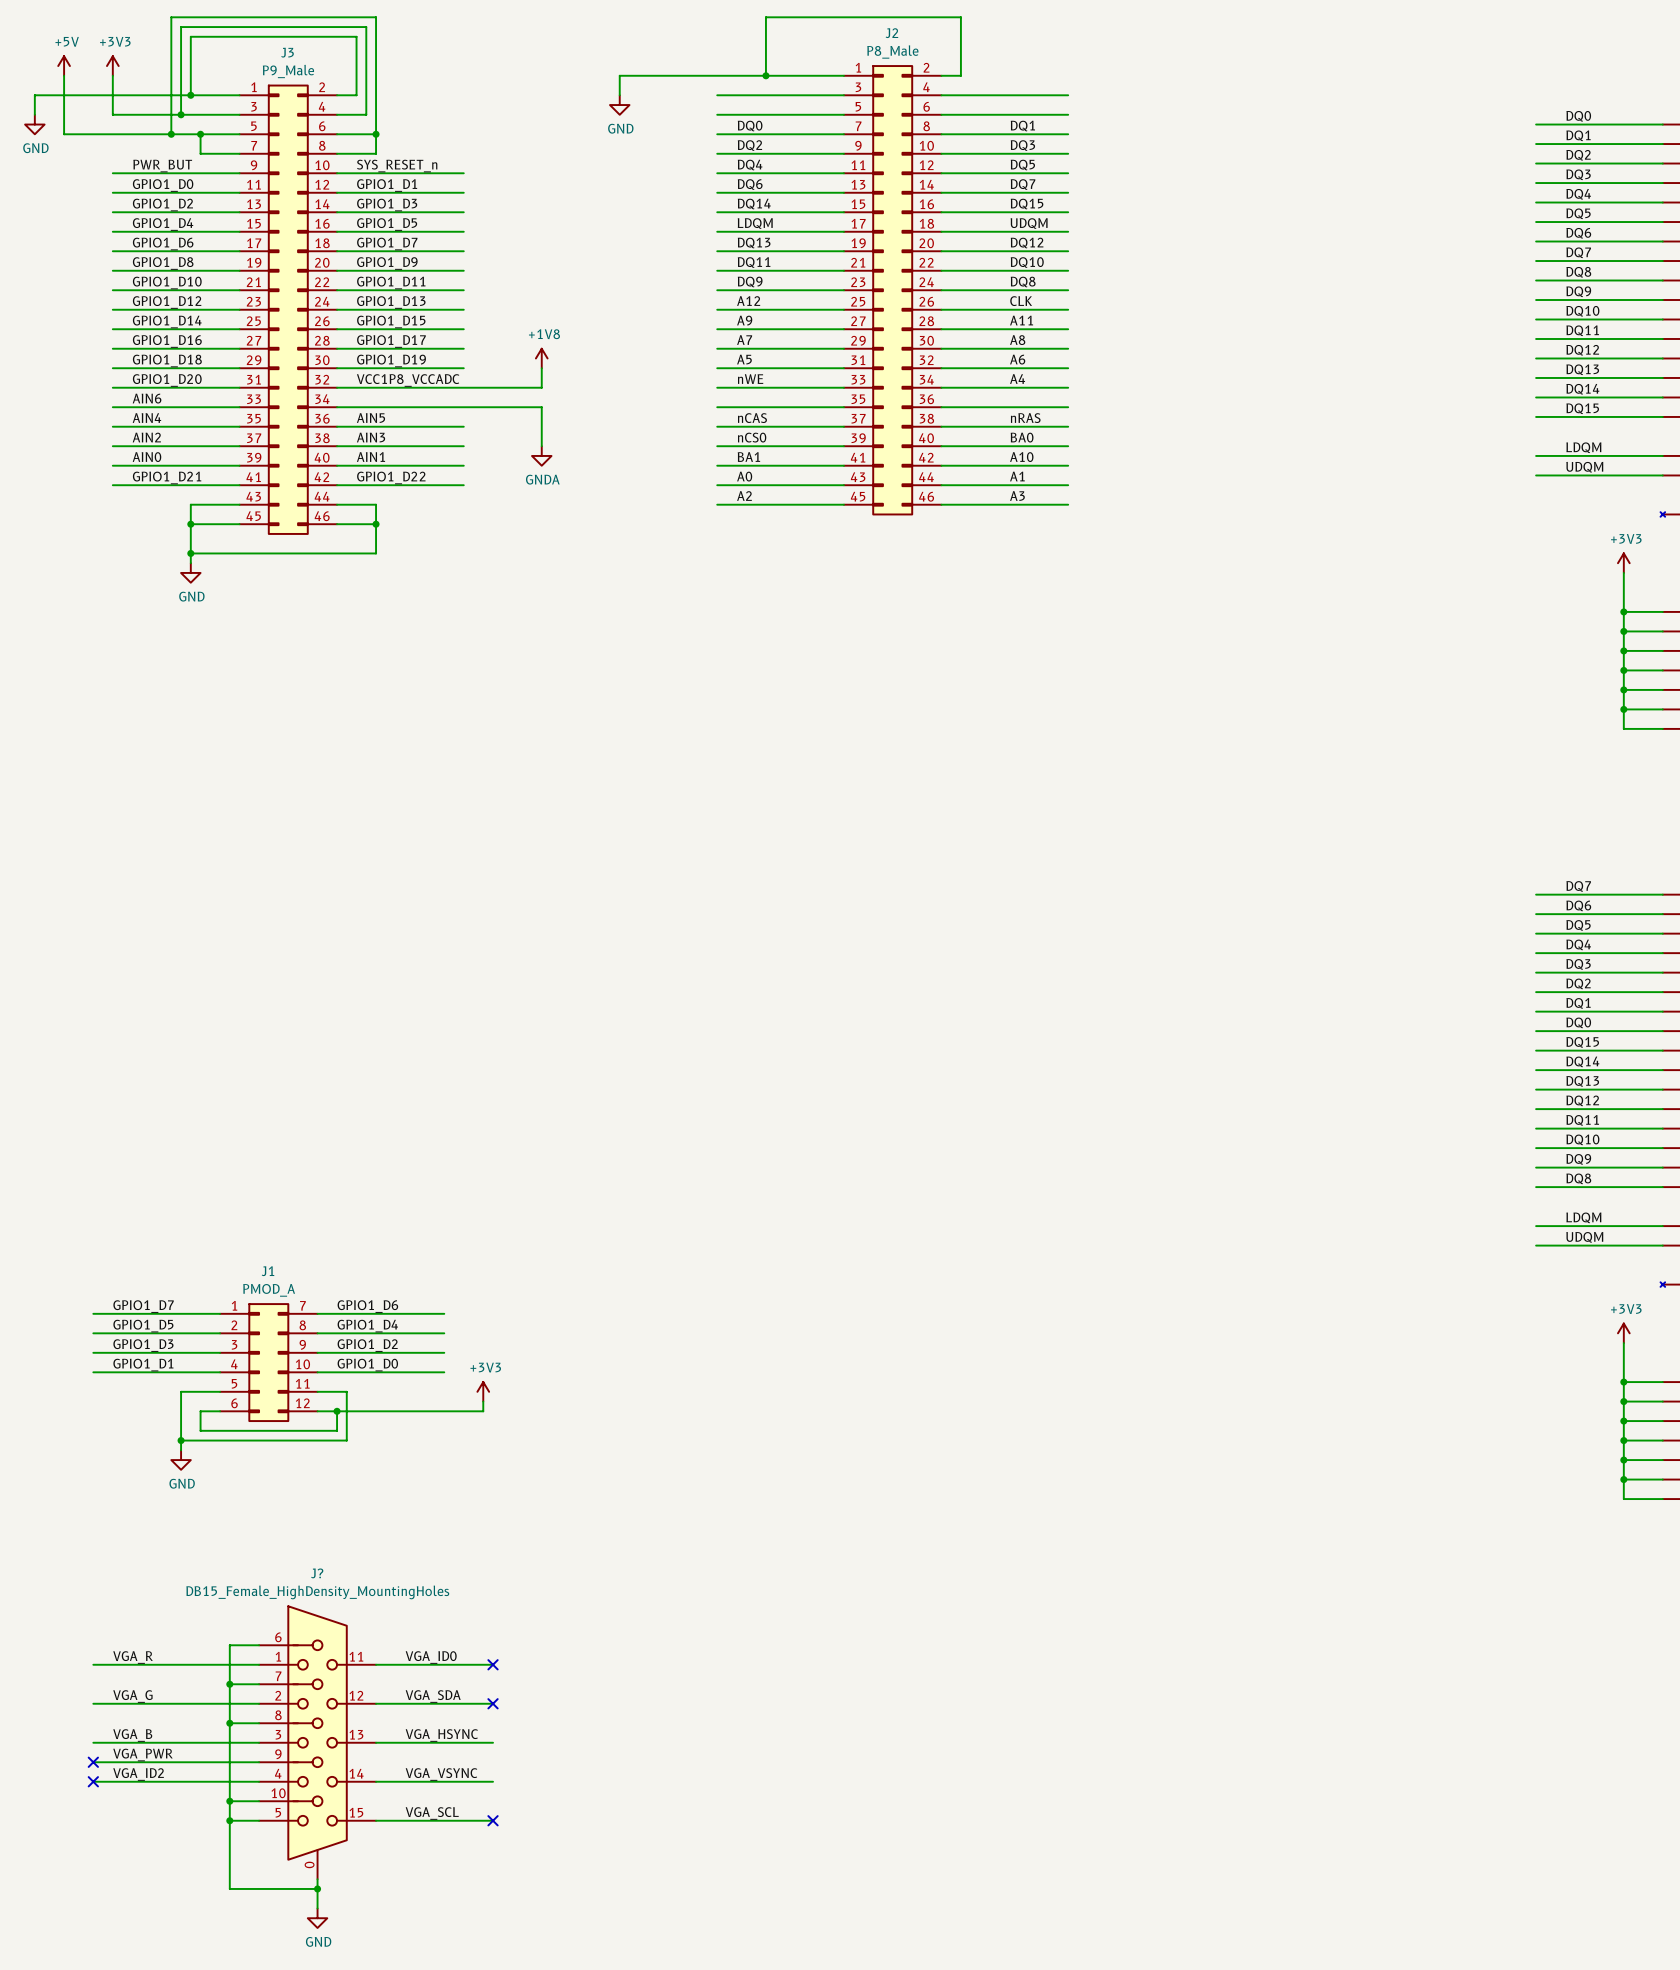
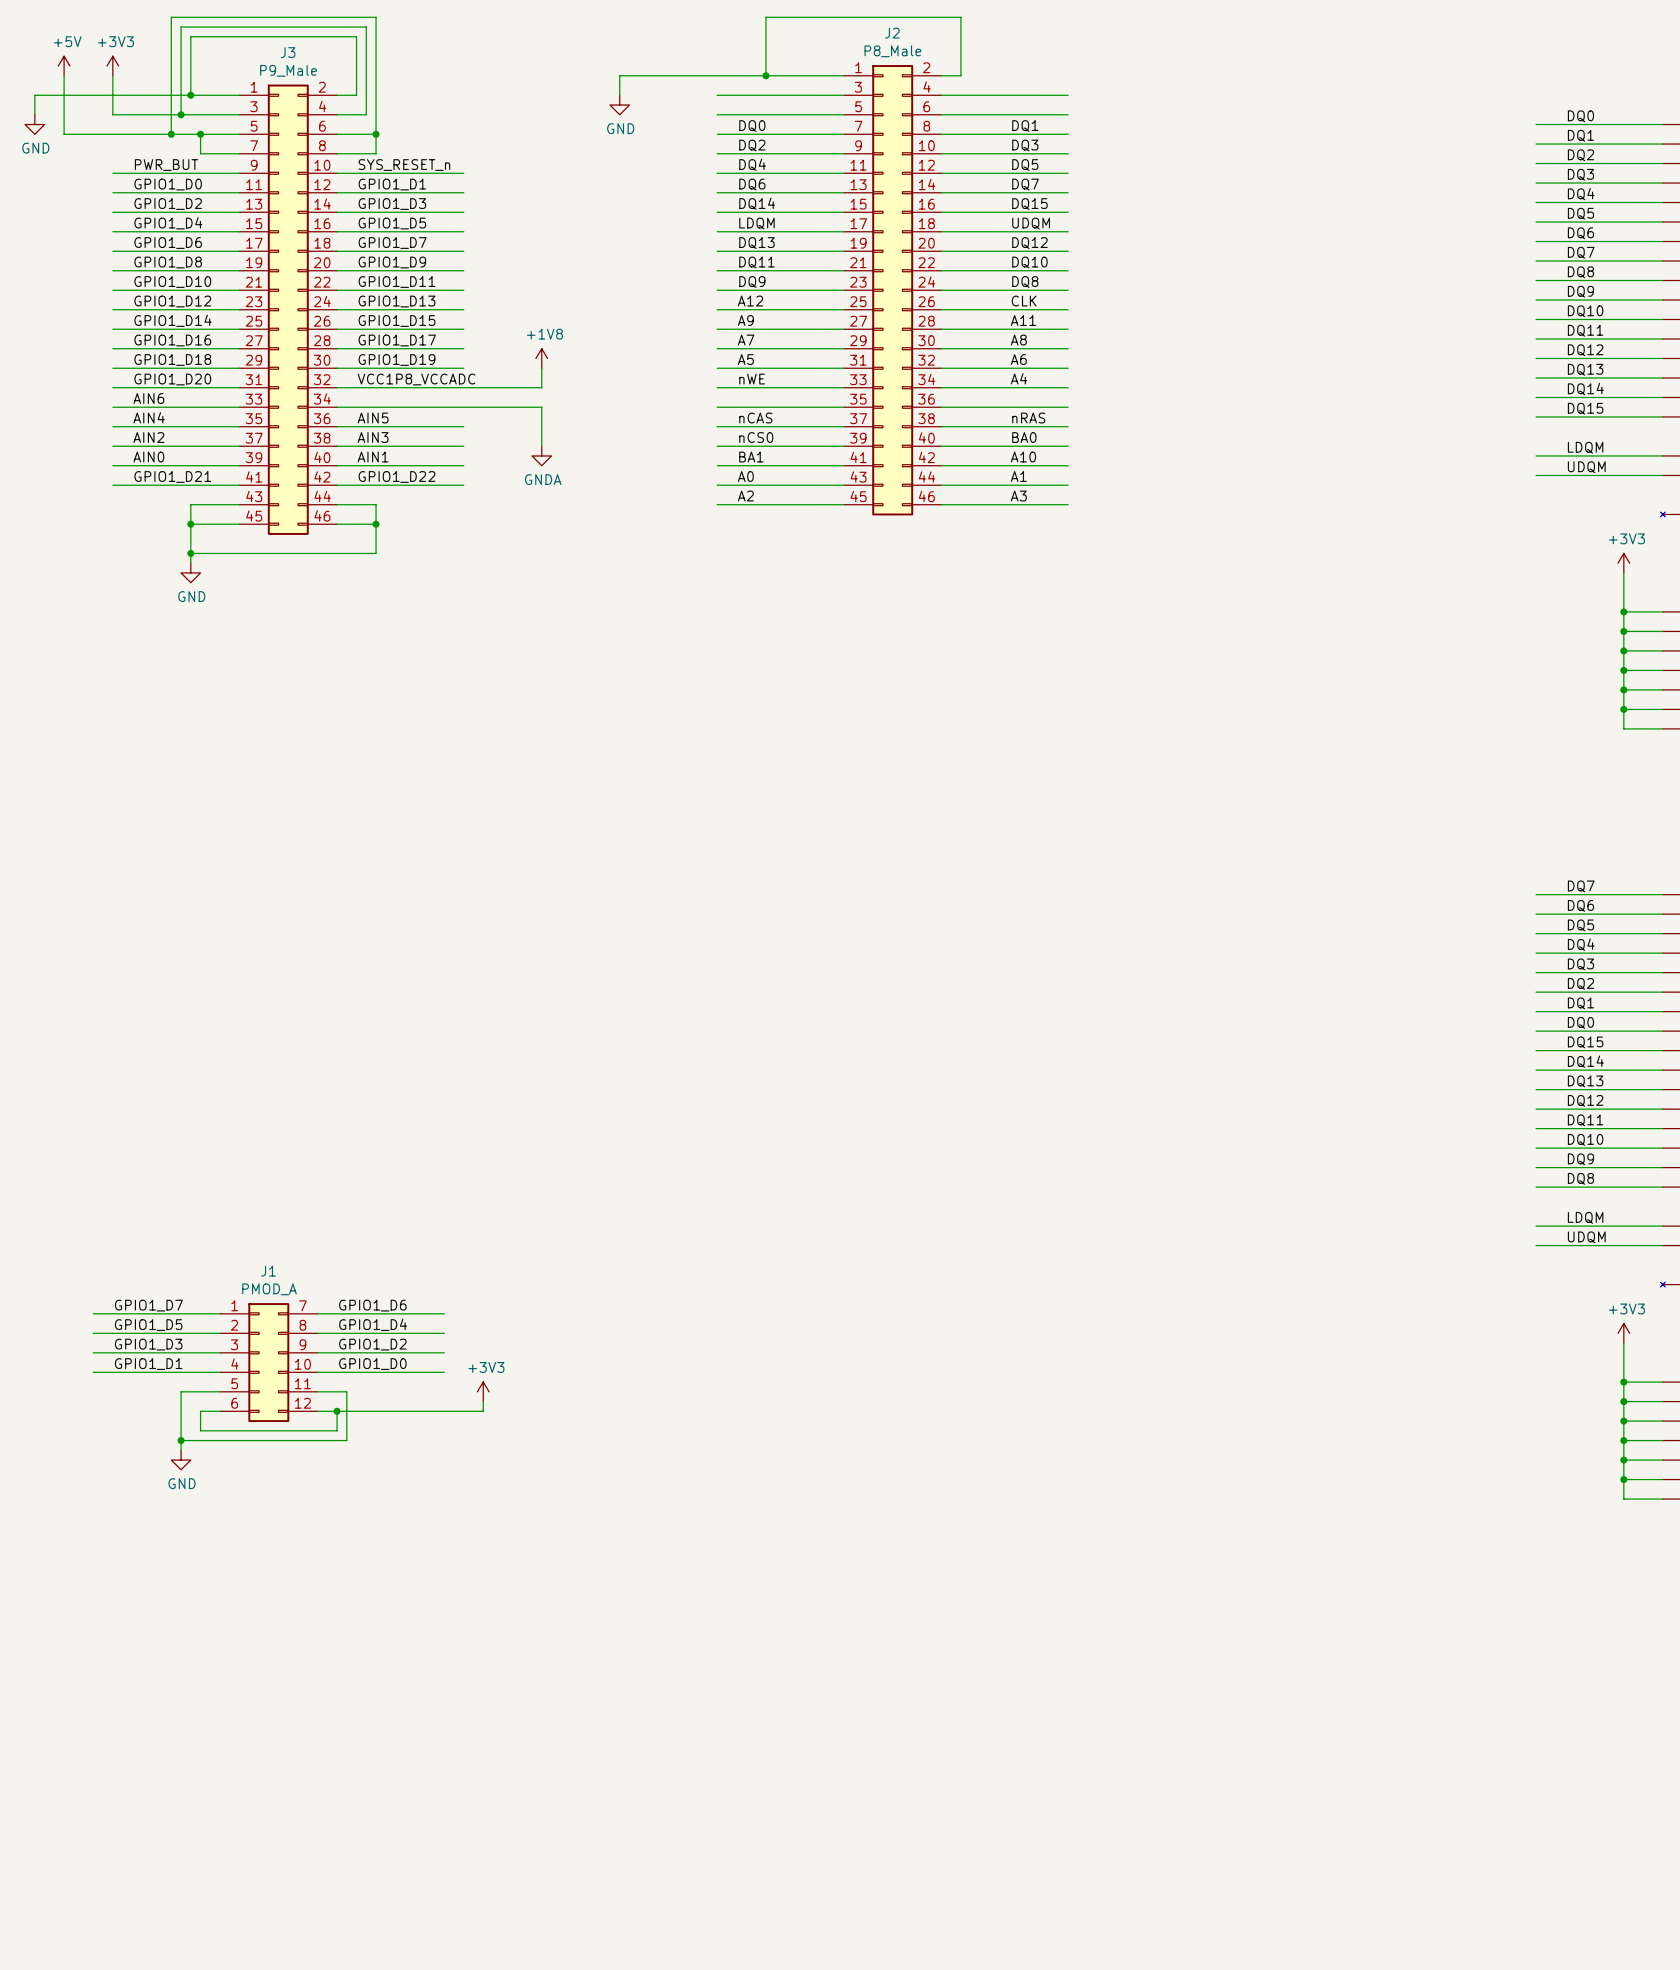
wire: (259, 1645) (229, 1645) (229, 1888) (317, 1888) -> none
label: VGA_R (133, 1657) -> none
label: VGA_ID0 (431, 1657) -> none
wire: (93, 1664) (259, 1664) -> none
wire: (376, 1664) (493, 1664) -> none
no-connect mark: (493, 1664) -> none
wire: (229, 1684) (259, 1684) -> none
junction: (229, 1684) -> none
label: VGA_G (132, 1696) -> none
label: VGA_SDA (433, 1696) -> none
wire: (93, 1703) (259, 1703) -> none
wire: (376, 1703) (493, 1703) -> none
no-connect mark: (493, 1703) -> none
wire: (229, 1723) (259, 1723) -> none
junction: (229, 1723) -> none
label: VGA_B (132, 1735) -> none
label: VGA_HSYNC (441, 1735) -> none
wire: (93, 1742) (259, 1742) -> none
J?: DB15_Female_HighDensity_MountingHoles (317, 1742) -> none
wire: (376, 1742) (493, 1742) -> none
label: VGA_PWR (142, 1755) -> none
wire: (93, 1762) (259, 1762) -> none
no-connect mark: (93, 1762) -> none
label: VGA_ID2 (138, 1774) -> none
label: VGA_VSYNC (441, 1774) -> none
wire: (93, 1781) (259, 1781) -> none
no-connect mark: (93, 1781) -> none
wire: (376, 1781) (493, 1781) -> none
wire: (229, 1801) (259, 1801) -> none
junction: (229, 1801) -> none
label: VGA_SCL (432, 1813) -> none
wire: (229, 1820) (259, 1820) -> none
junction: (229, 1820) -> none
wire: (376, 1820) (493, 1820) -> none
no-connect mark: (493, 1820) -> none
wire: (317, 1879) (317, 1908) -> none
junction: (317, 1888) -> none
power symbol: GND (317, 1918) -> none

